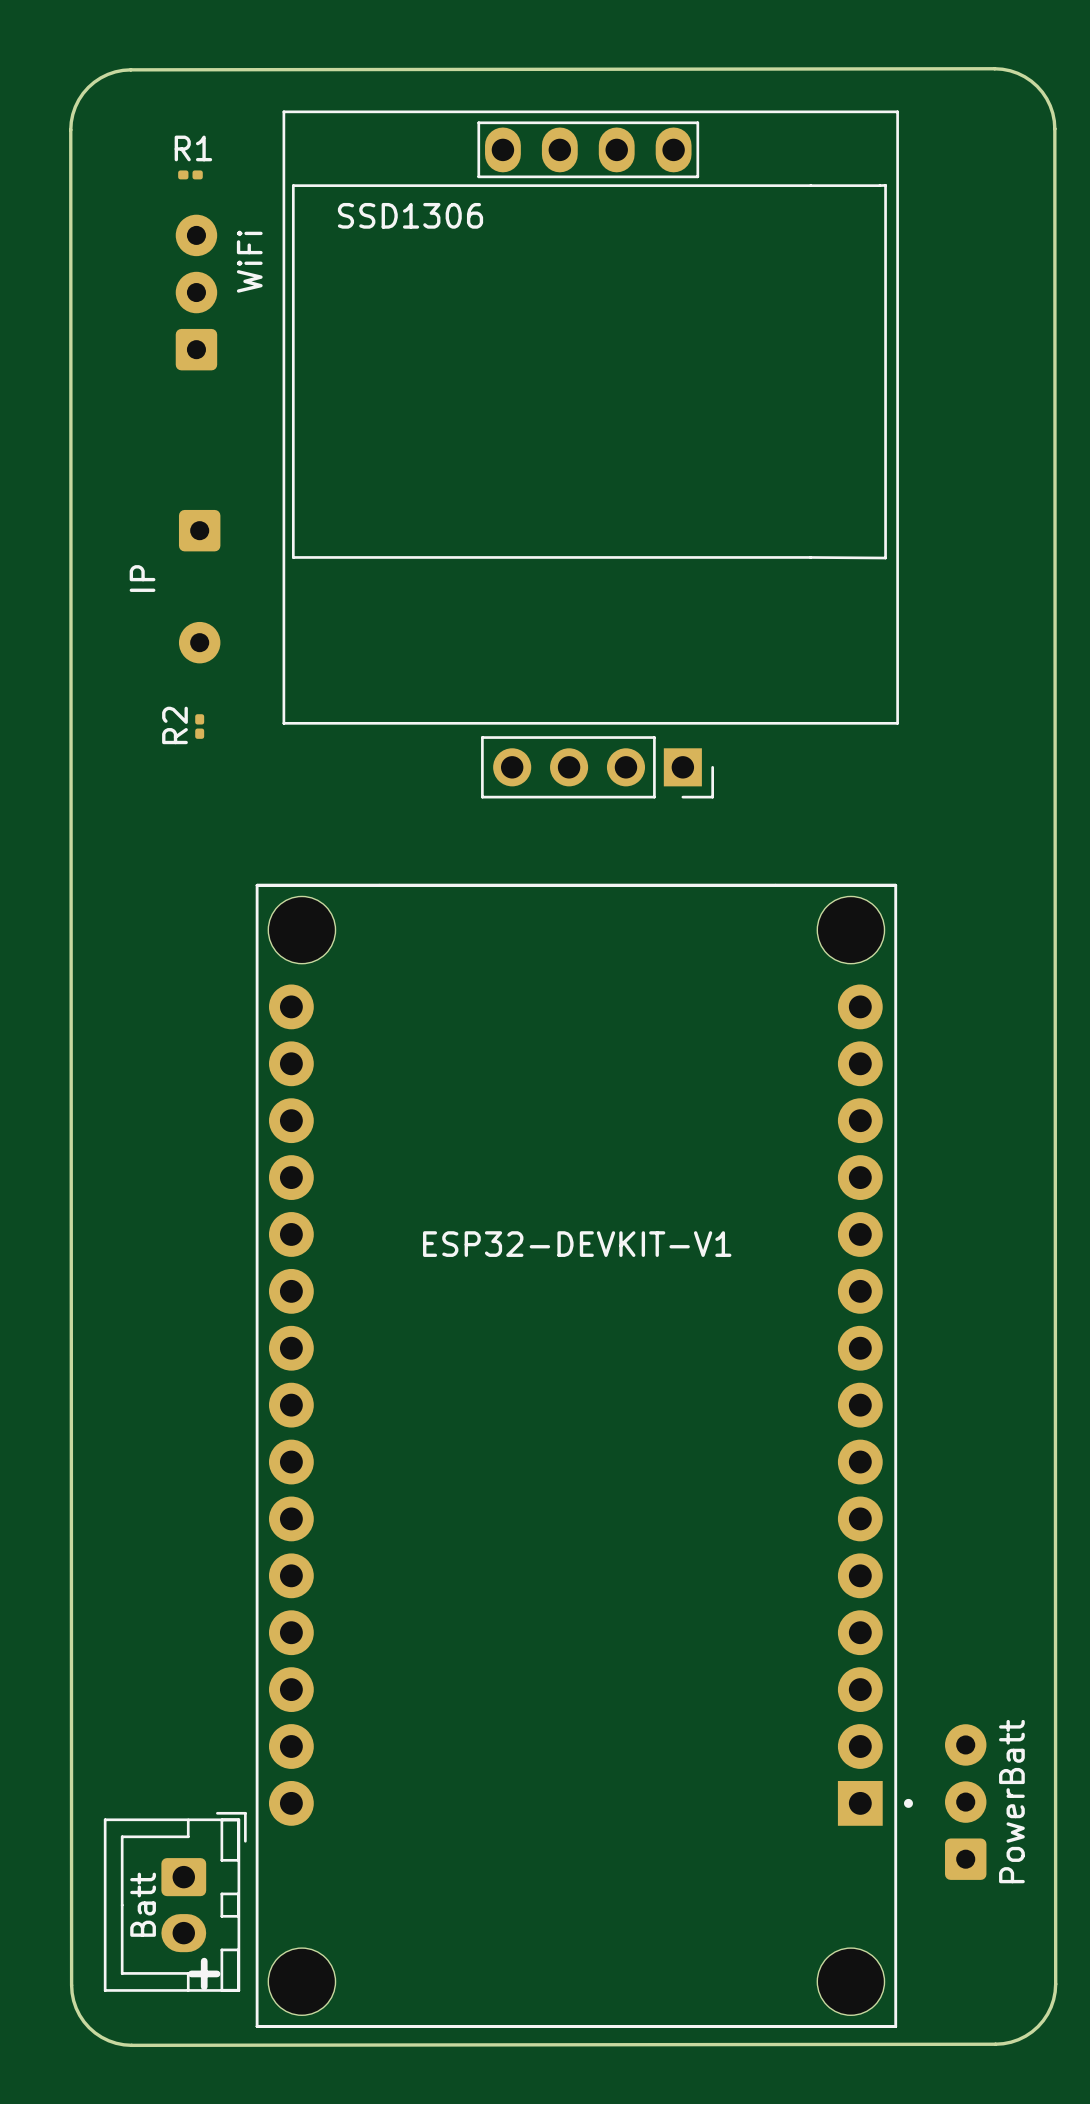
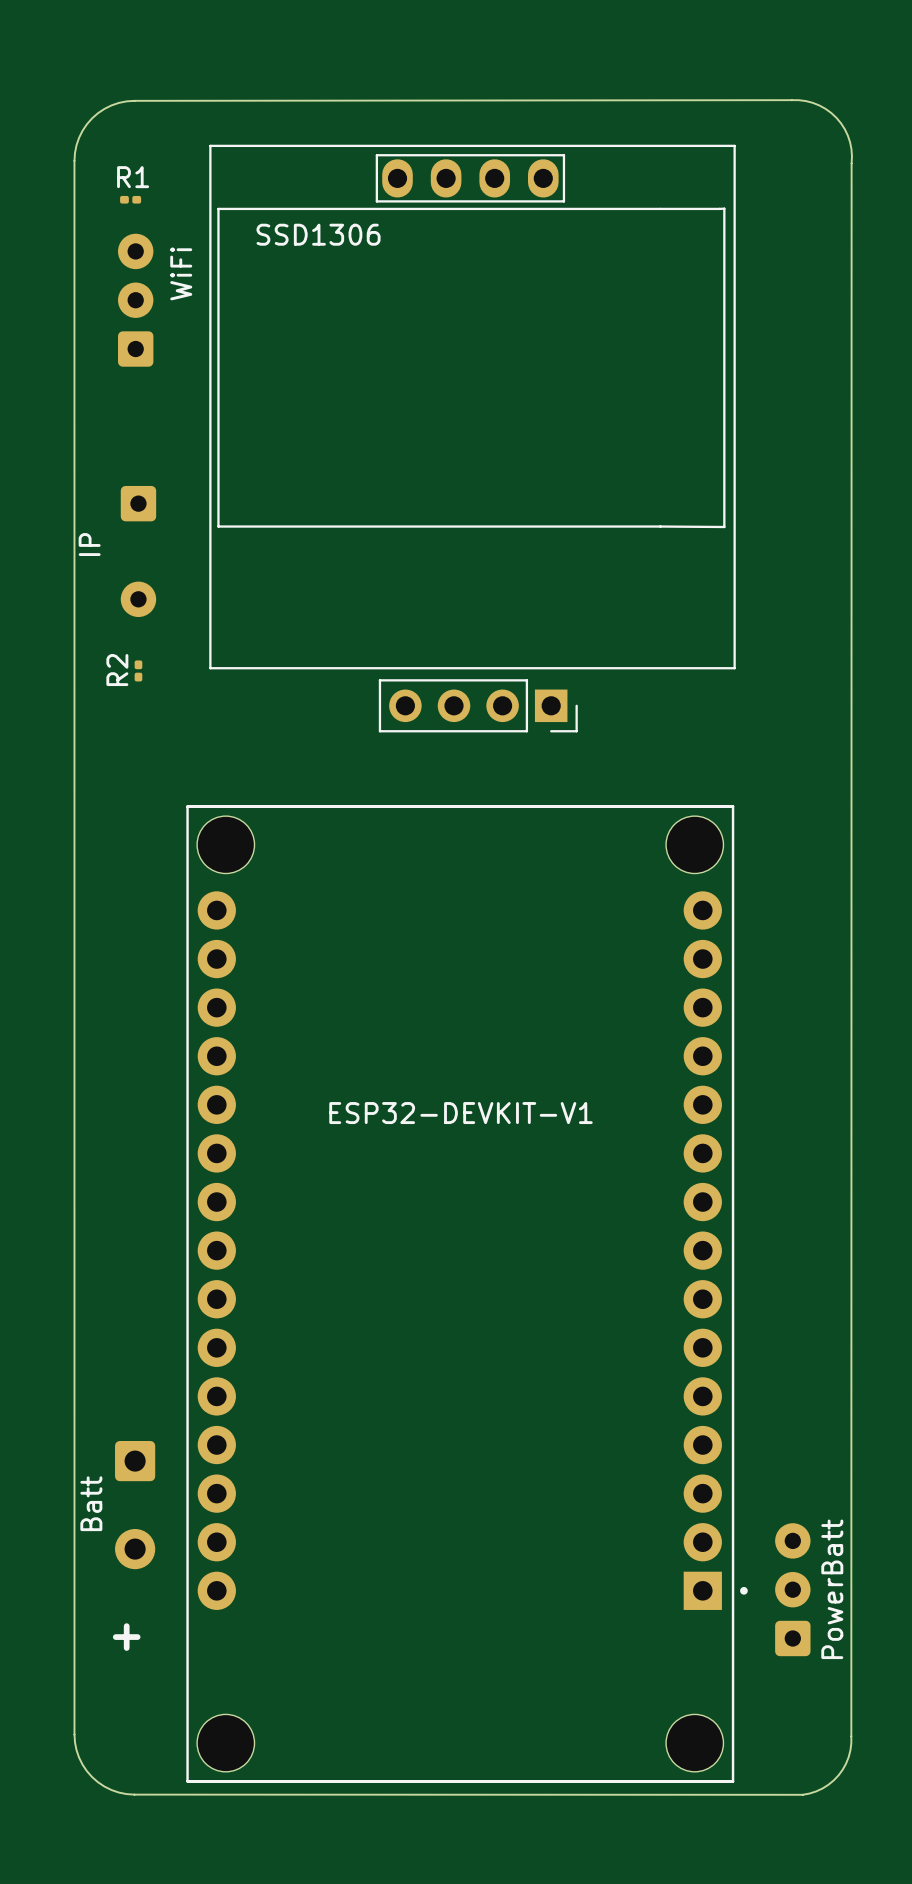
board edge: (994, 68) (130, 69) (107, 74) (94, 82) (83, 93) (75, 106) (70, 129) (71, 1985) (76, 2008) (84, 2021) (95, 2032) (108, 2040) (131, 2045) (995, 2044) (1018, 2039) (1032, 2031) (1043, 2020) (1051, 2007) (1055, 1984) (1054, 128) (1050, 105) (1037, 86) (1017, 73) (994, 68) -> (791, 100) (134, 100) (111, 105) (97, 113) (86, 124) (79, 137) (74, 160) (74, 1734) (76, 1750) (82, 1764) (97, 1782) (111, 1790) (134, 1794) (802, 1794) (816, 1791) (828, 1784) (838, 1775) (846, 1763) (851, 1743) (851, 156) (847, 135) (840, 123) (831, 112) (812, 102) (791, 100)
part: none -> Batt (135, 1505)
part: Batt (175, 1901) -> none
text position: + (204, 1973) -> + (126, 1637)

